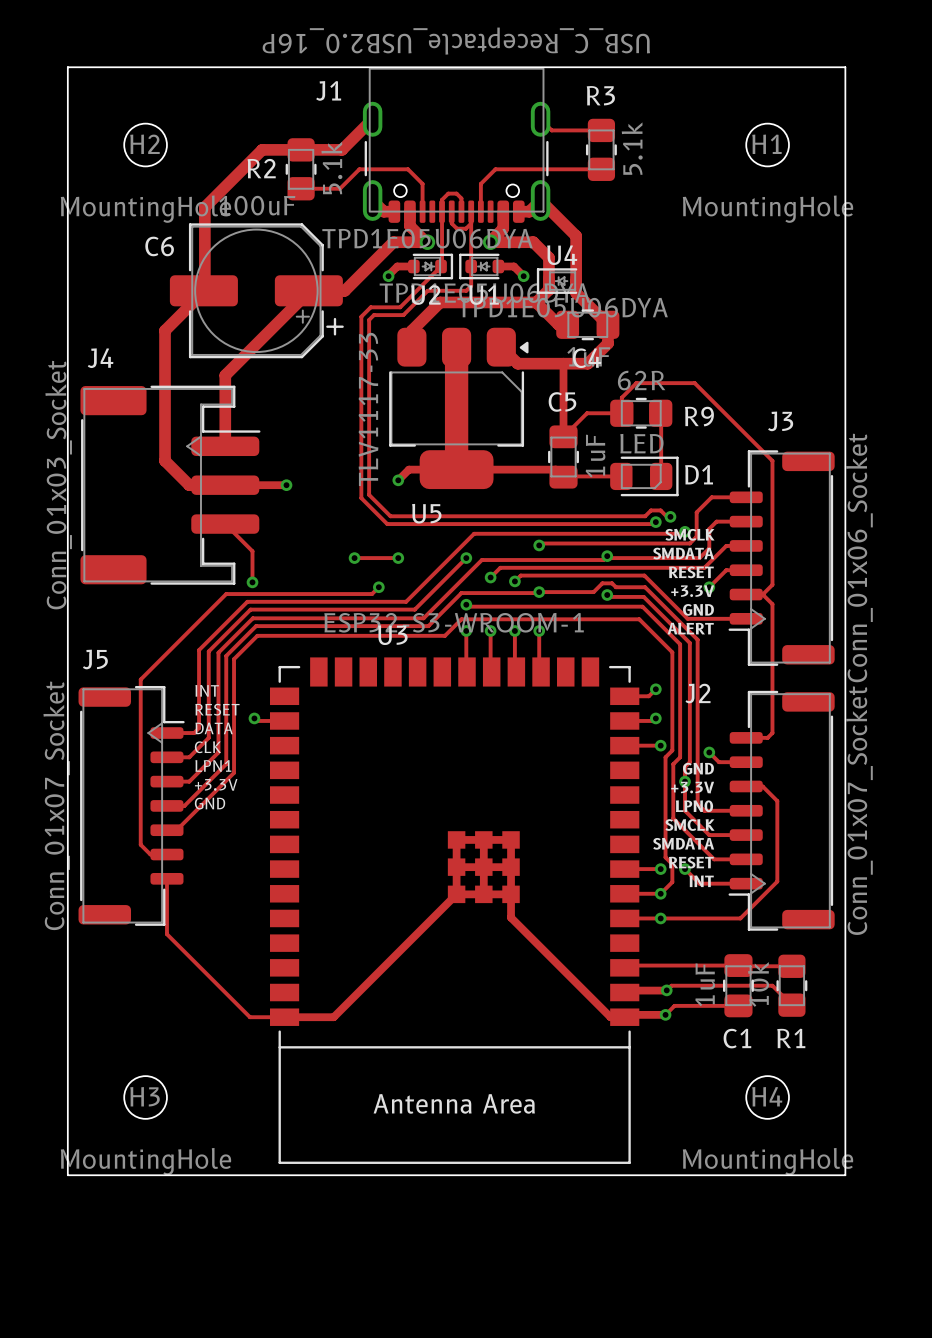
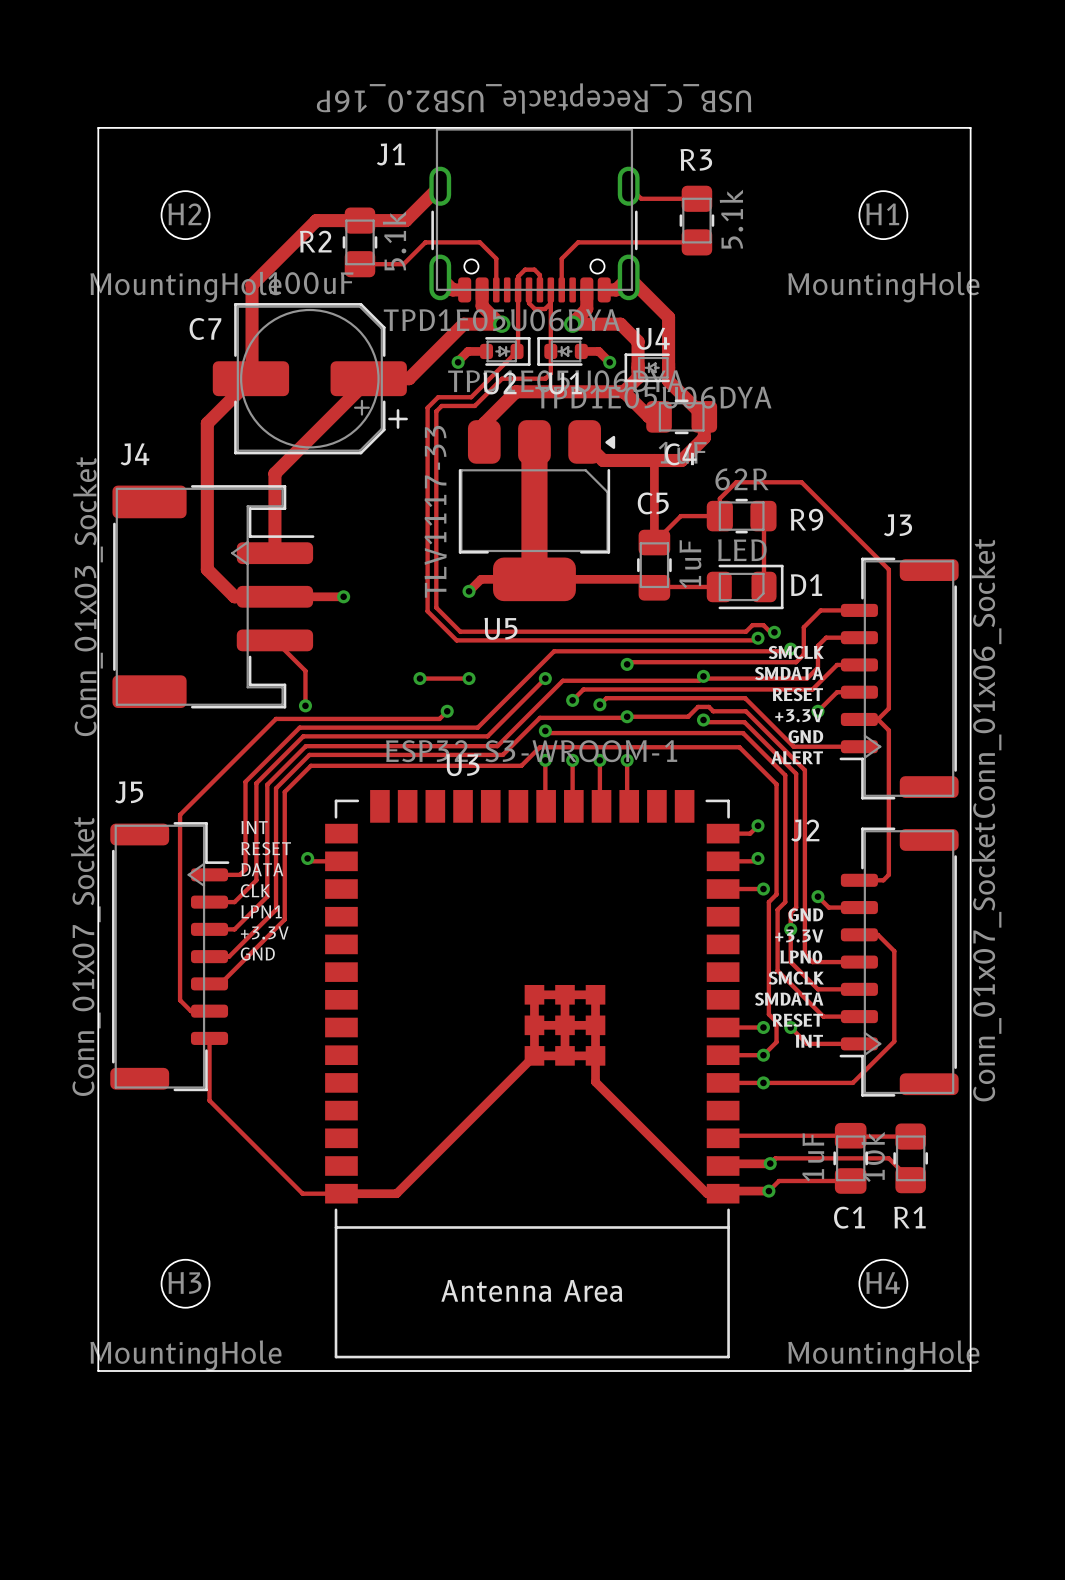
C6 name: C6 (159, 246) -> C7 (205, 328)

